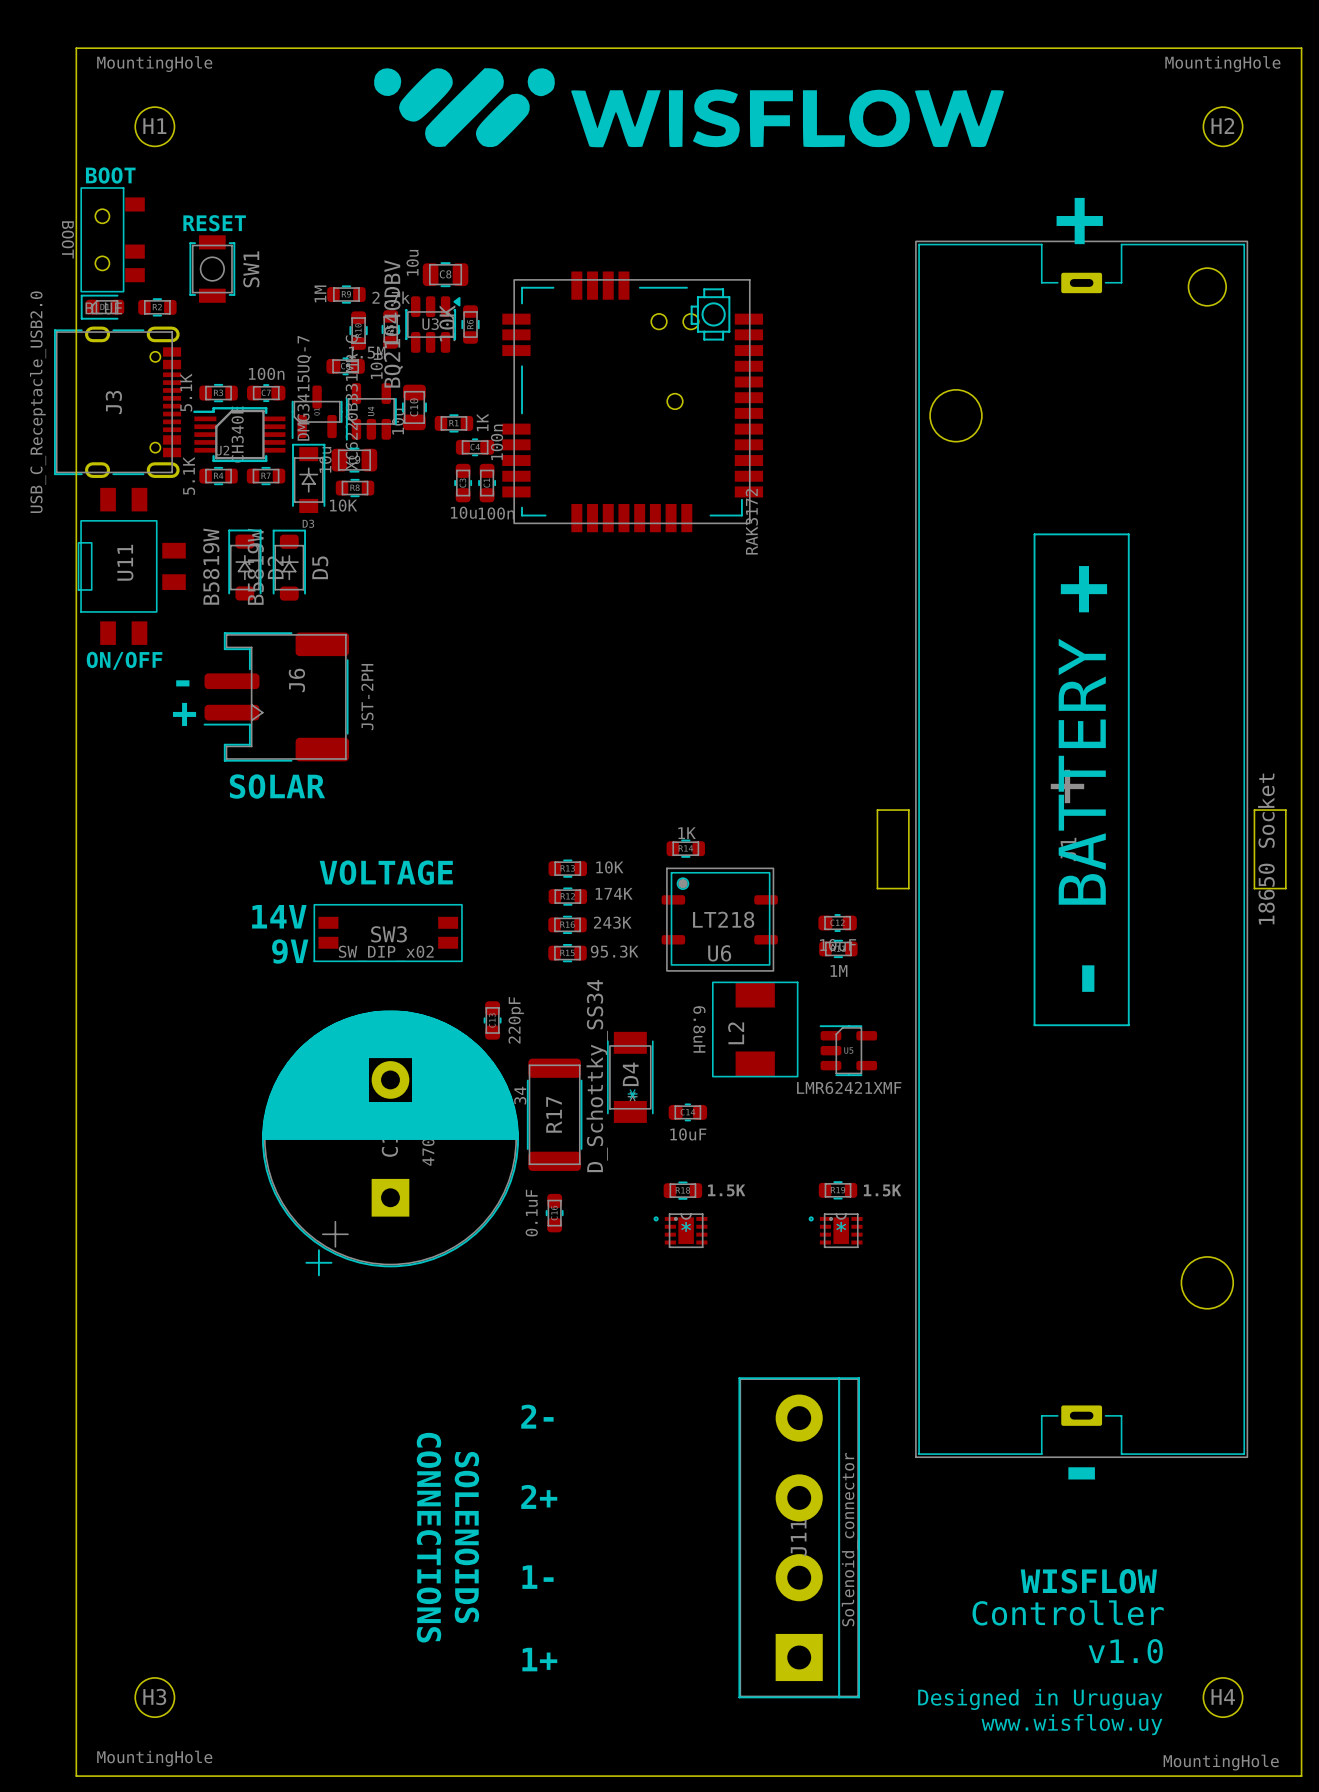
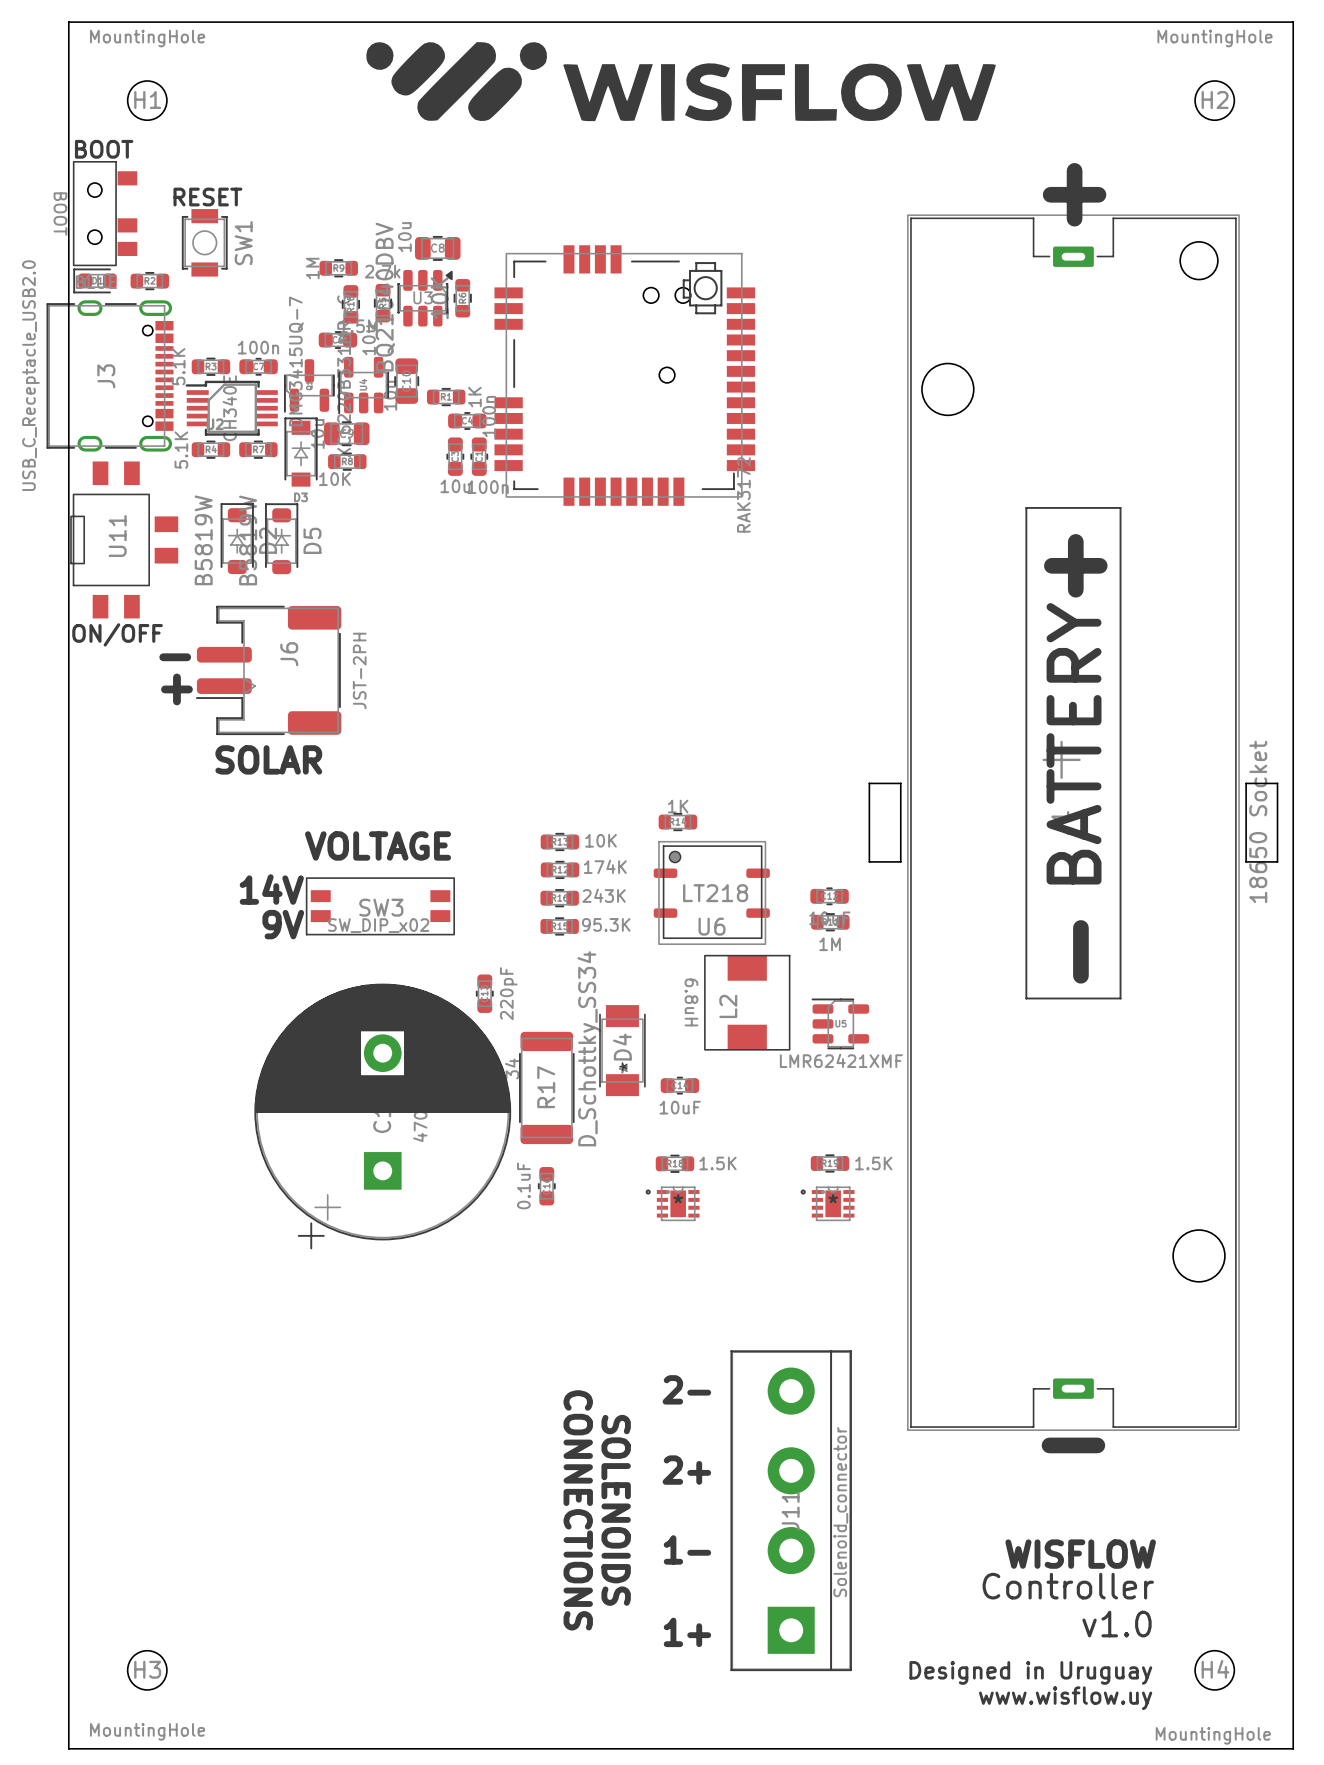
text position: 2- (537, 1416) -> 2- (686, 1389)
text position: 2+ (539, 1496) -> 2+ (686, 1470)
text position: CONNECTIONS (428, 1537) -> CONNECTIONS (578, 1510)
text position: SOLENOIDS (466, 1537) -> SOLENOIDS (616, 1510)
text position: 1- (537, 1577) -> 1- (687, 1549)
text position: 1+ (539, 1659) -> 1+ (687, 1632)

